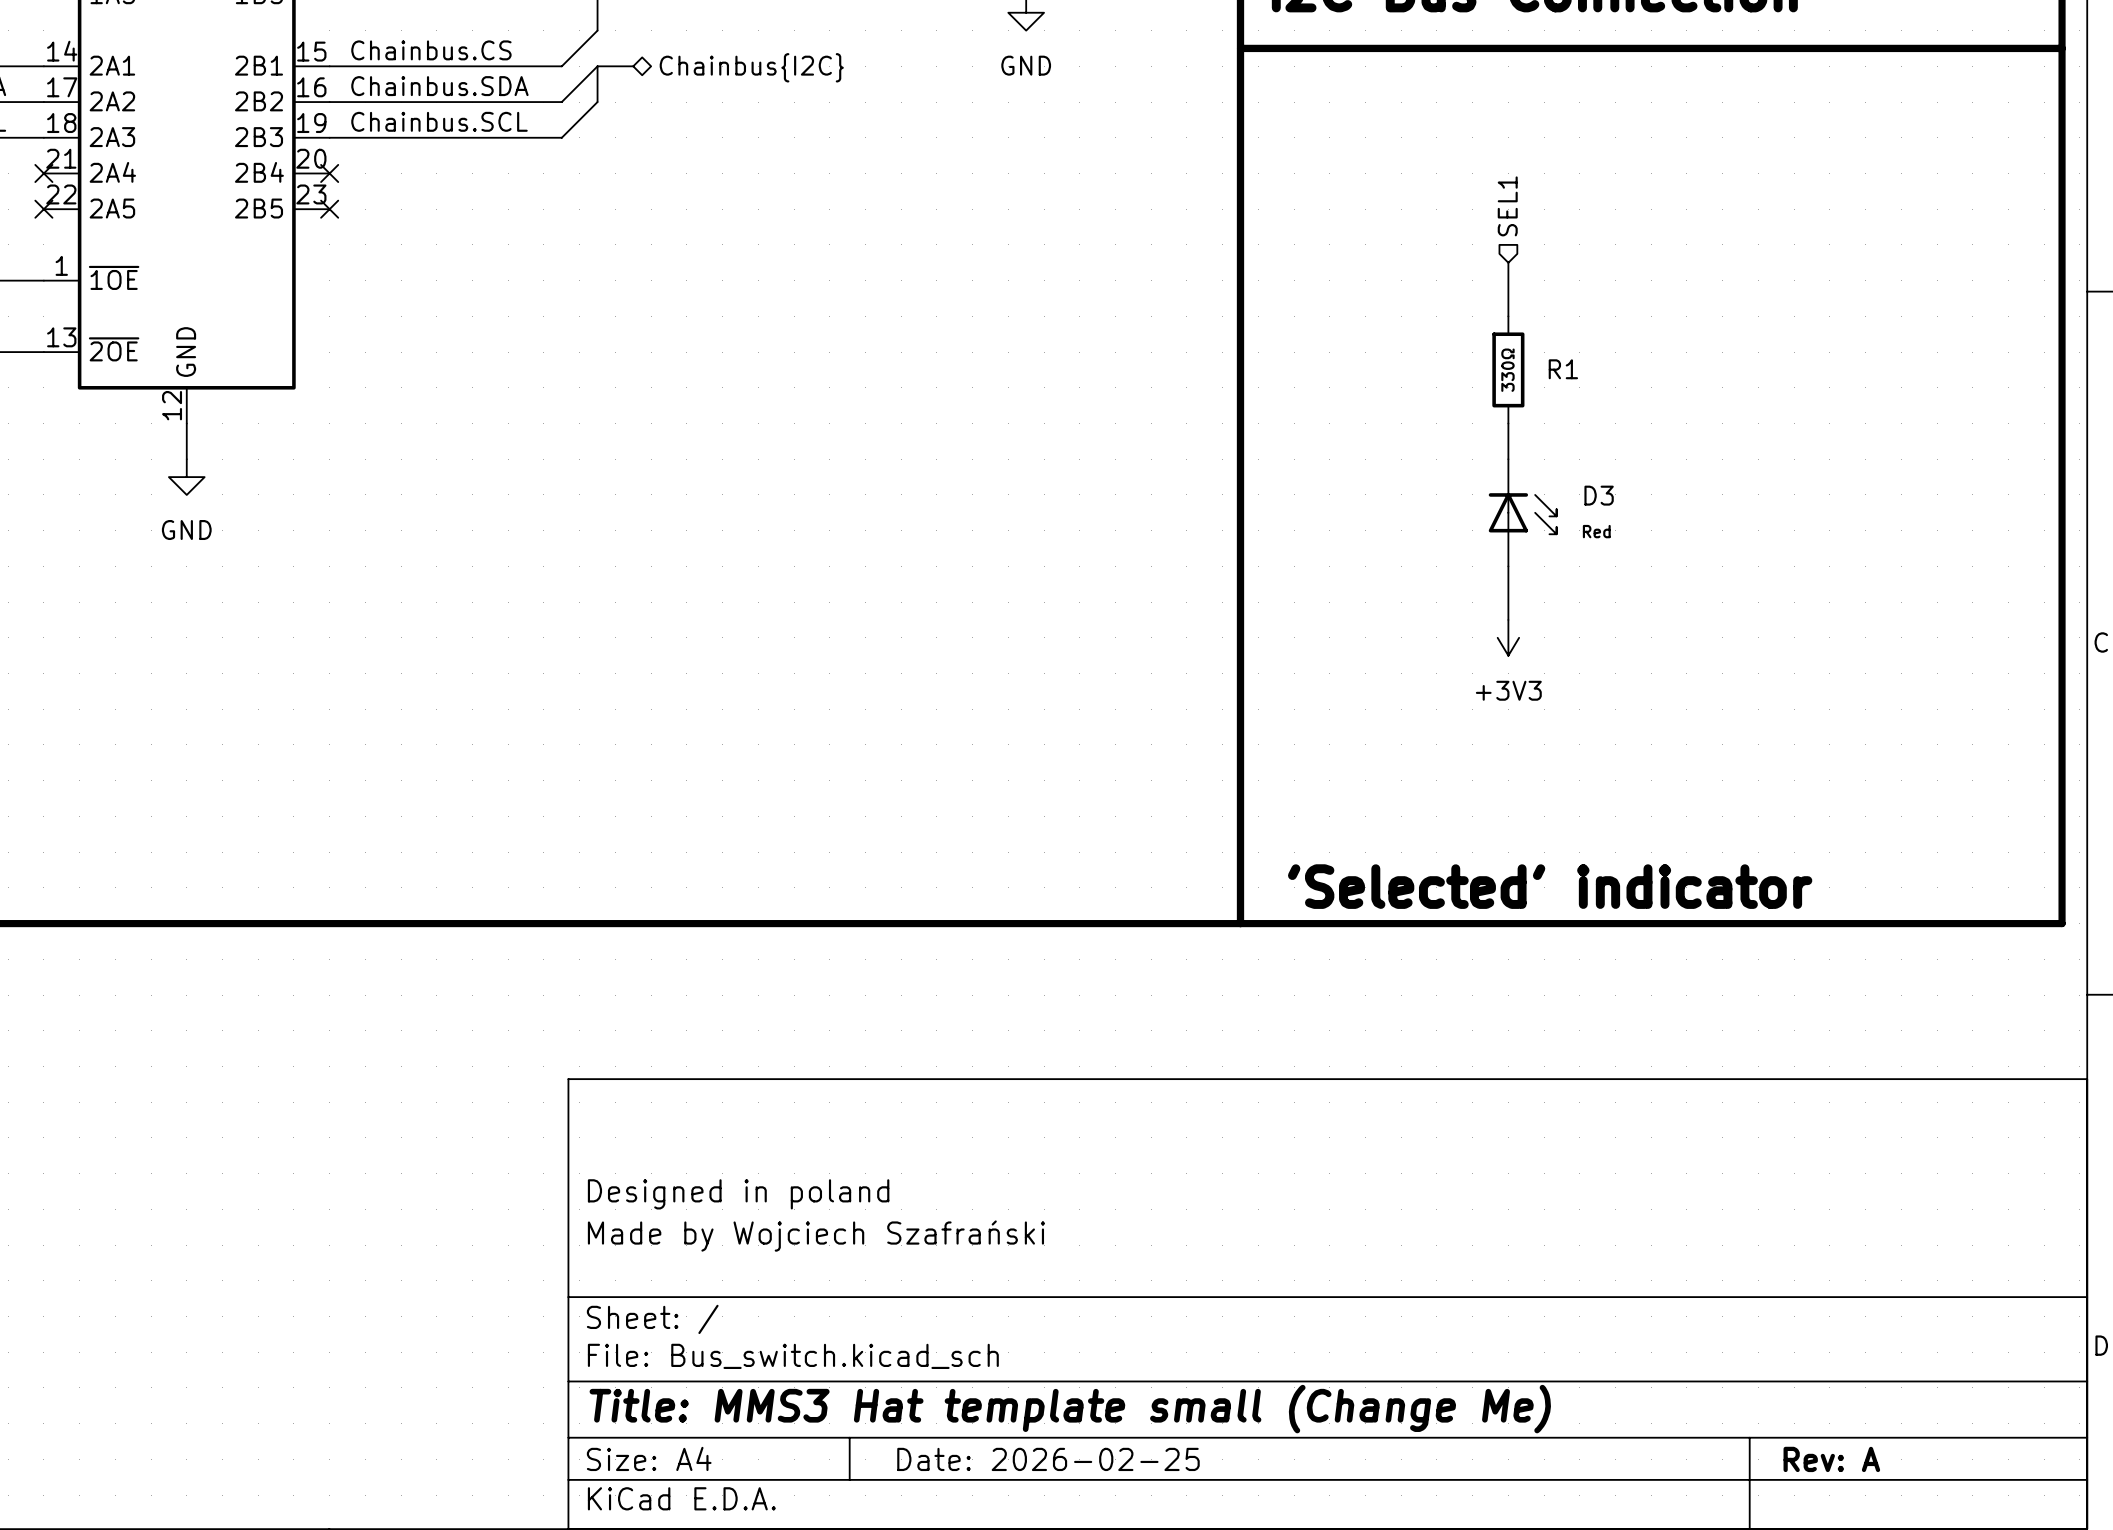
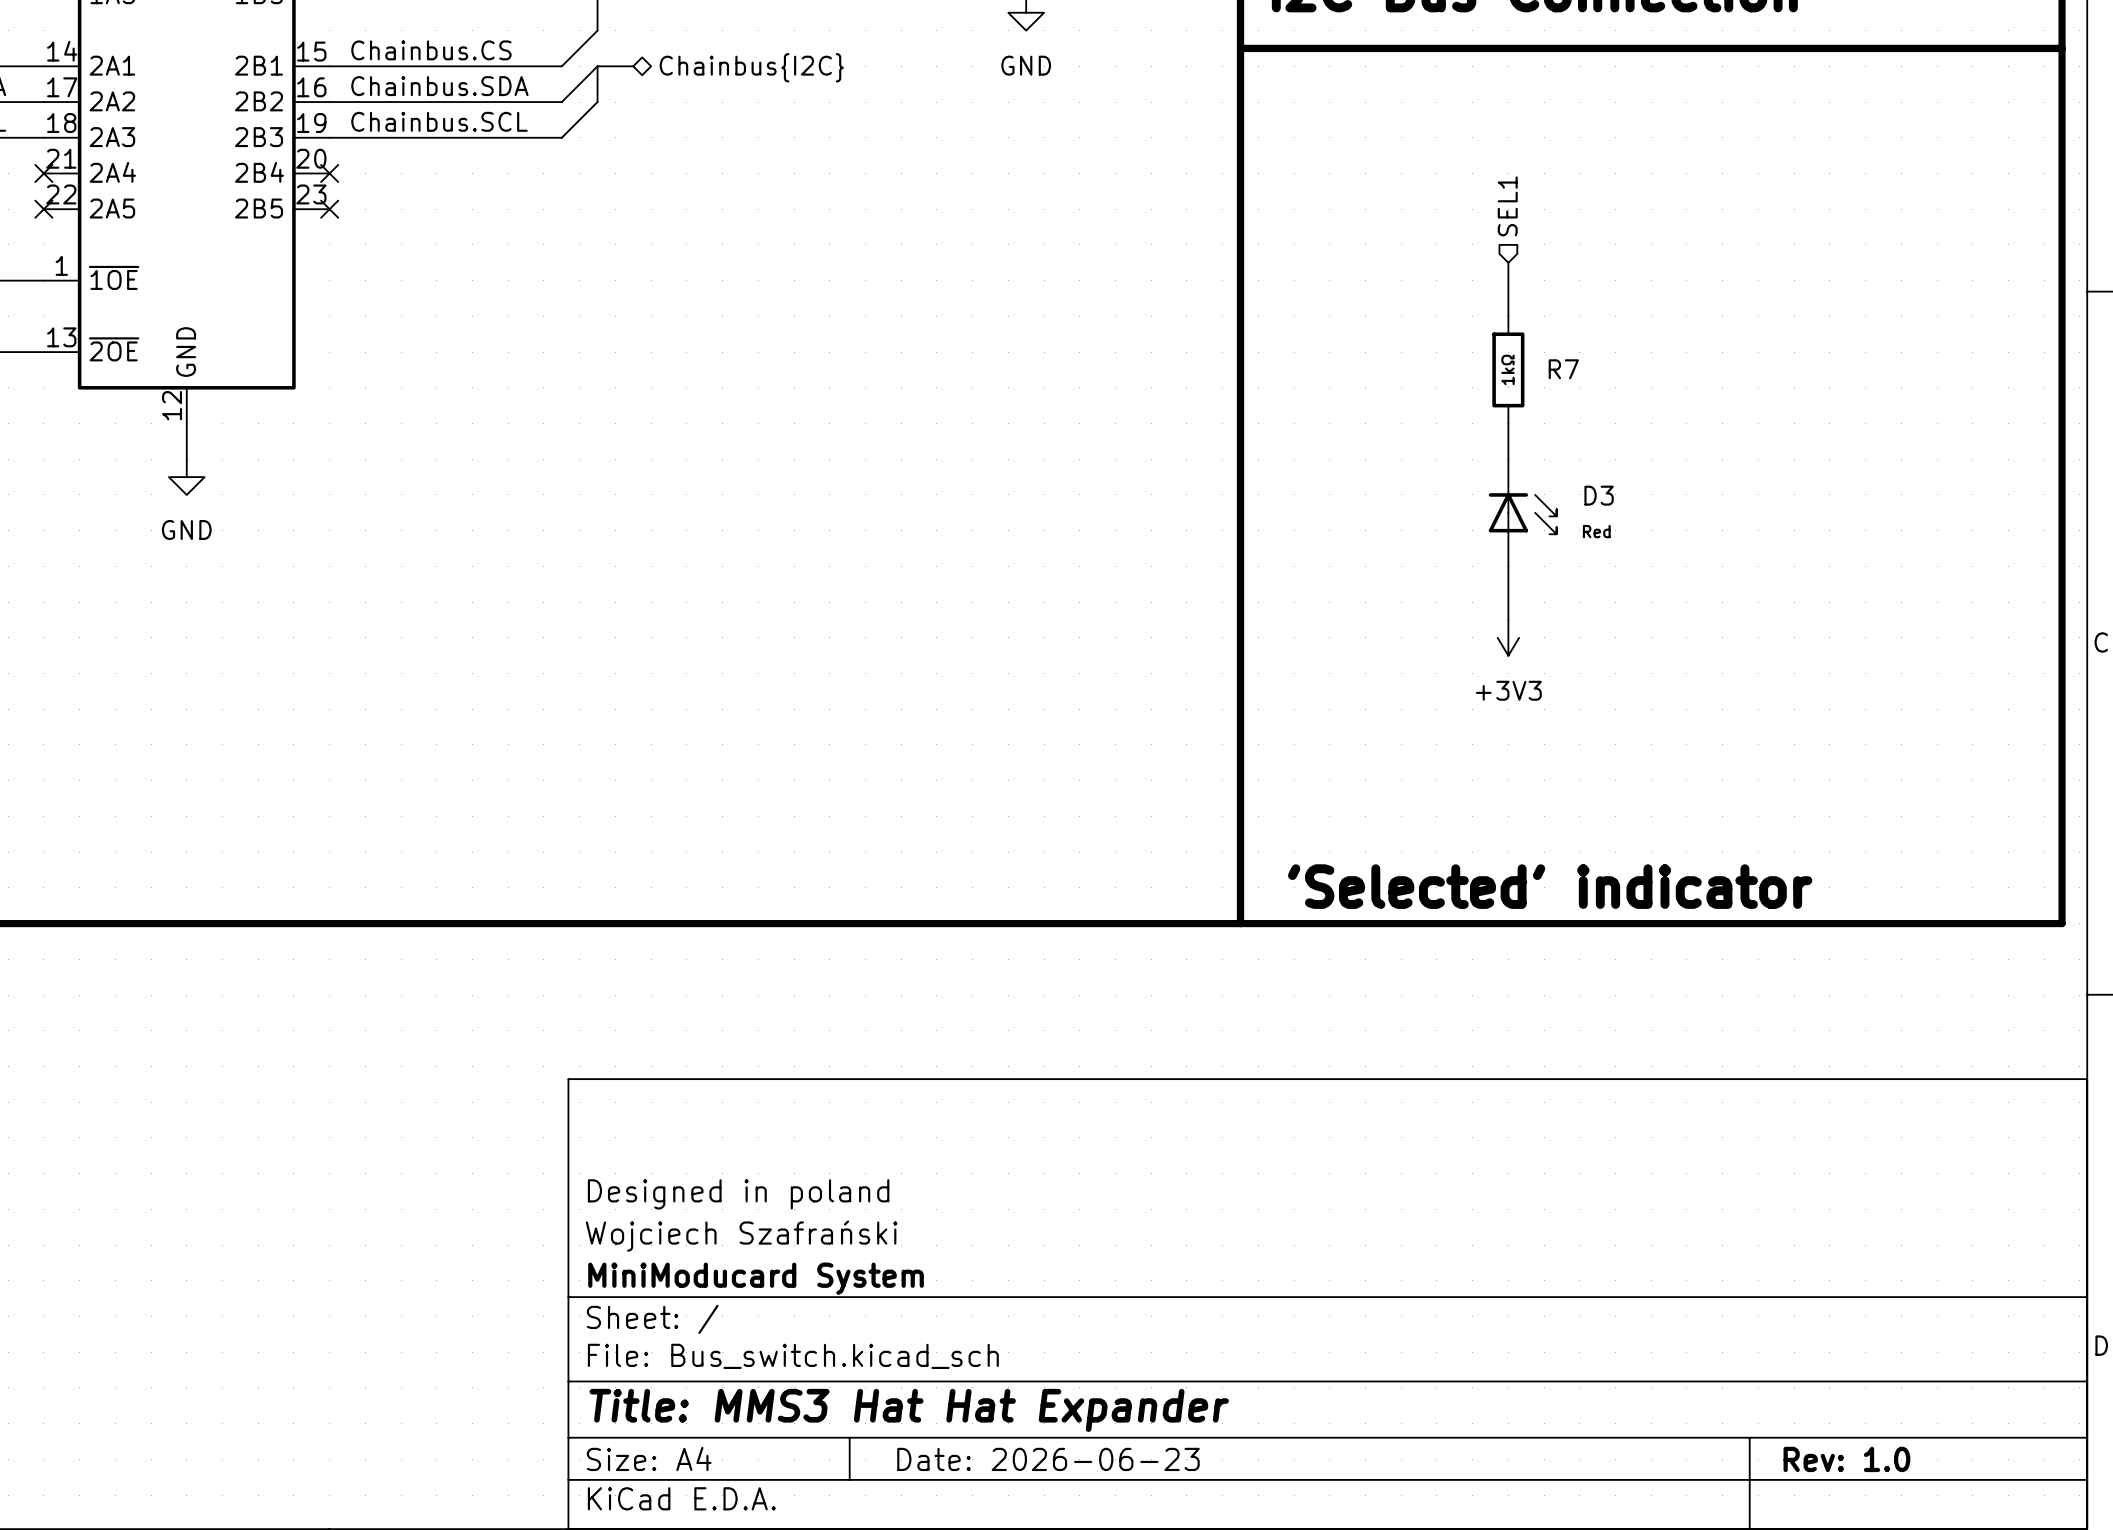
R1 name: R1 (1563, 369) -> R7 (1563, 369)
R1 value: 330Ω (1507, 370) -> 1kΩ (1507, 369)
title block: Made by Wojciech Szafrański (816, 1236) -> Wojciech Szafrański (741, 1236)
title block: none -> MiniModucard System (756, 1278)
title block: Title: MMS3 Hat template small (Change Me) (1070, 1409) -> Title: MMS3 Hat Hat Expander (909, 1410)
title block: Date: 2026-02-25 (1048, 1459) -> Date: 2026-06-23 (1048, 1459)
title block: Rev: A (1831, 1459) -> Rev: 1.0 (1846, 1459)

